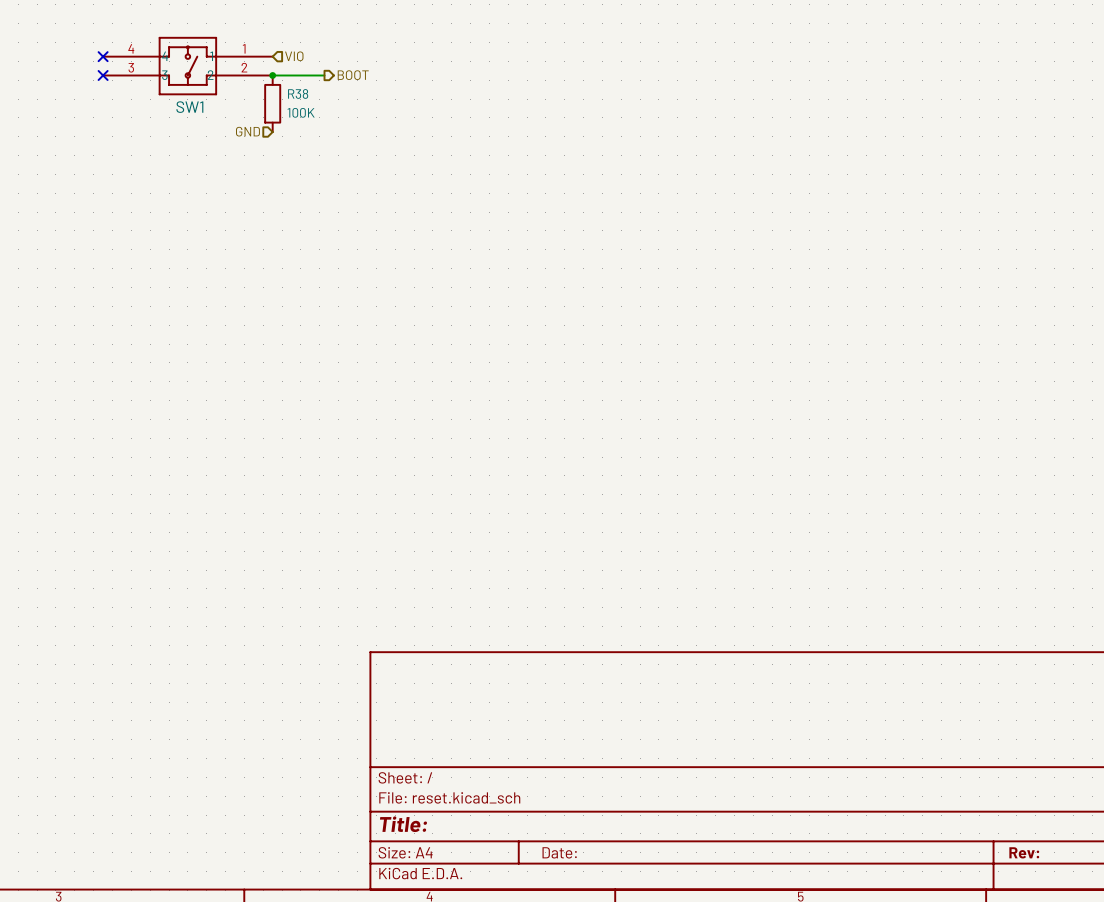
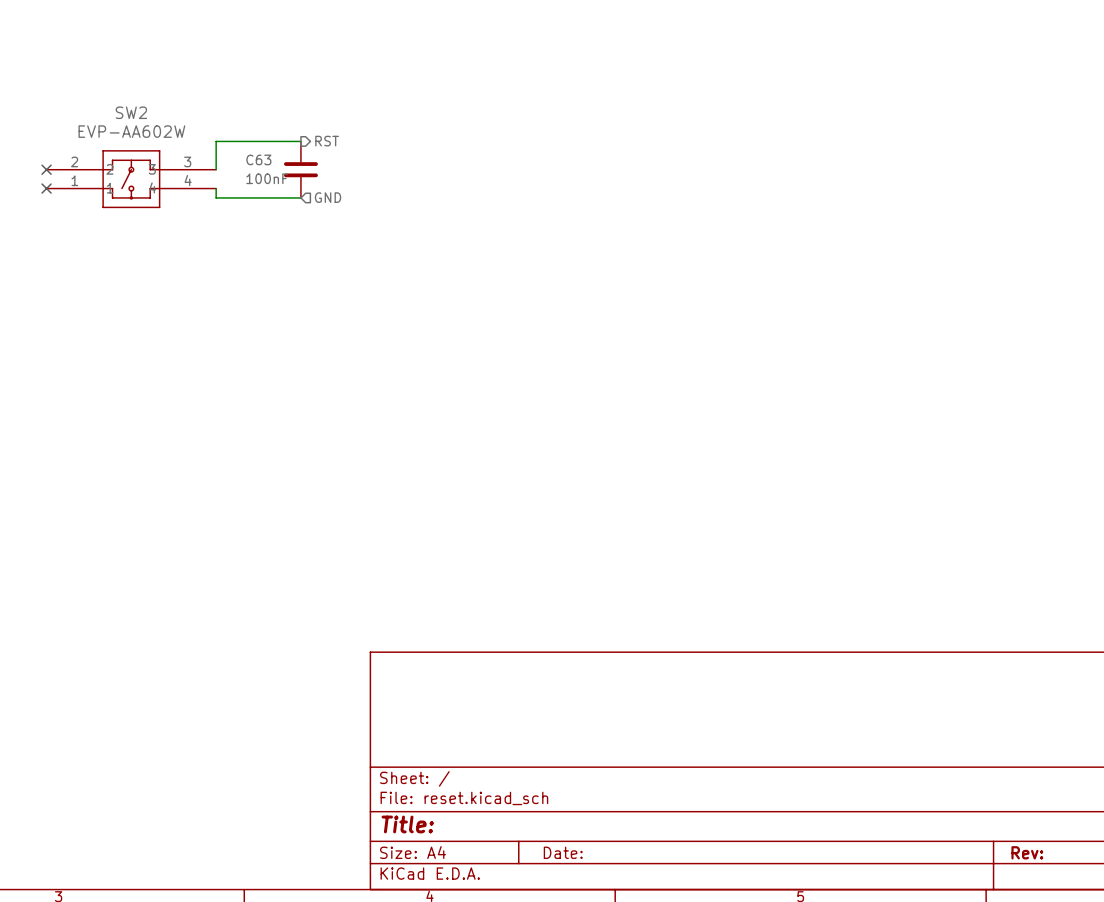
no-connect mark: (103, 56) -> none
hierarchical label: VIO (294, 56) -> none
SW1: (187, 66) -> none
no-connect mark: (103, 75) -> none
wire: (272, 75) (324, 75) -> none
junction: (272, 75) -> none
hierarchical label: BOOT (353, 75) -> none
R38: 100K (272, 103) -> none
hierarchical label rotation: 0° (247, 131) -> 180° (328, 197)
hierarchical label position: GND (247, 131) -> GND (328, 197)
wire: none -> (300, 141) (216, 141) (216, 169)
hierarchical label: none -> RST (327, 141)
no-connect mark: none -> (46, 169)
C63: none -> 100nF (300, 169)
SW2: none -> EVP-AA602W (131, 179)
no-connect mark: none -> (46, 188)
wire: none -> (216, 188) (216, 197) (300, 197)

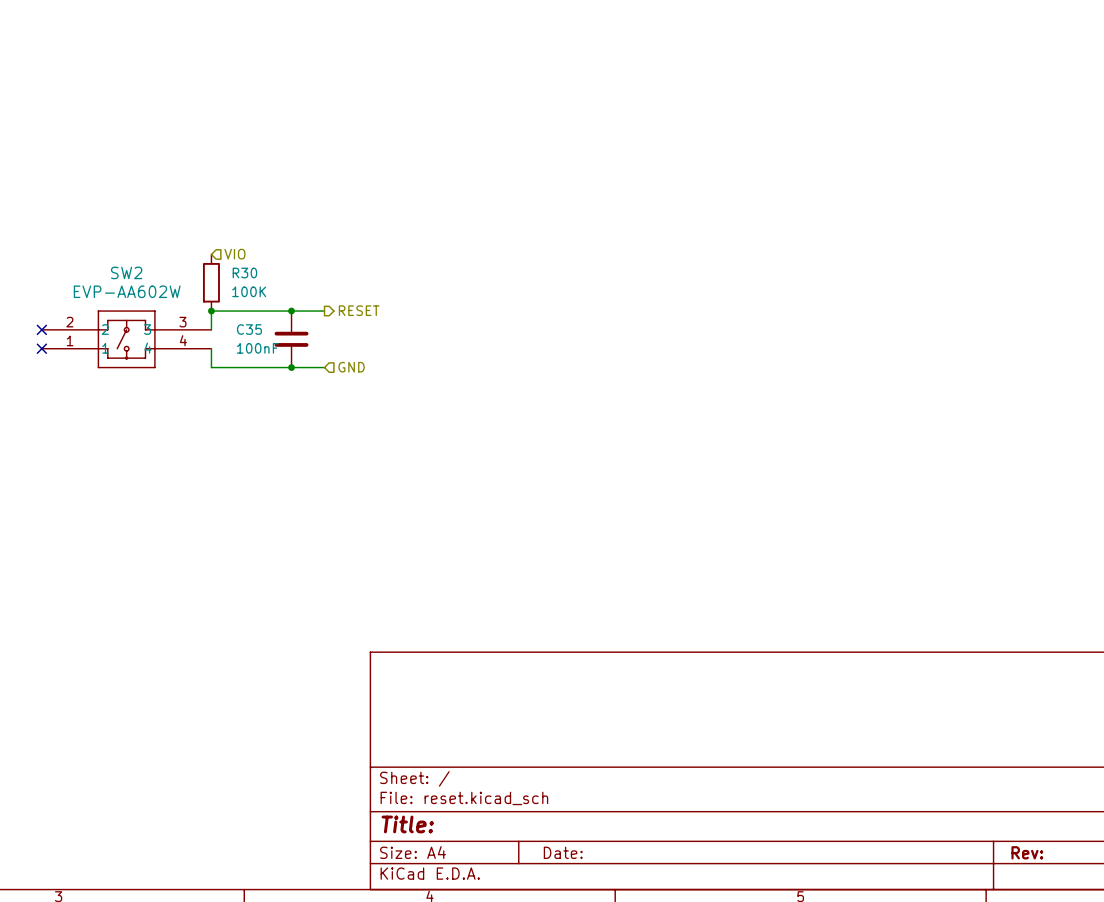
wire: (300, 141) (216, 141) (216, 169) -> none
hierarchical label: RST (327, 141) -> none
no-connect mark: (46, 169) -> none
C63: 100nF (300, 169) -> none
SW2 position: (131, 179) -> (126, 339)
no-connect mark: (46, 188) -> none
wire: (216, 188) (216, 197) (300, 197) -> none
hierarchical label position: GND (328, 197) -> GND (351, 367)
hierarchical label: none -> VIO (234, 254)
R30: none -> 100K (211, 282)
hierarchical label: none -> RESET (359, 310)
junction: none -> (211, 311)
junction: none -> (291, 311)
wire: none -> (324, 311) (211, 311) (211, 329)
no-connect mark: none -> (41, 329)
C35: none -> 100nF (291, 339)
no-connect mark: none -> (41, 348)
wire: none -> (211, 348) (211, 367) (324, 367)
junction: none -> (291, 367)

